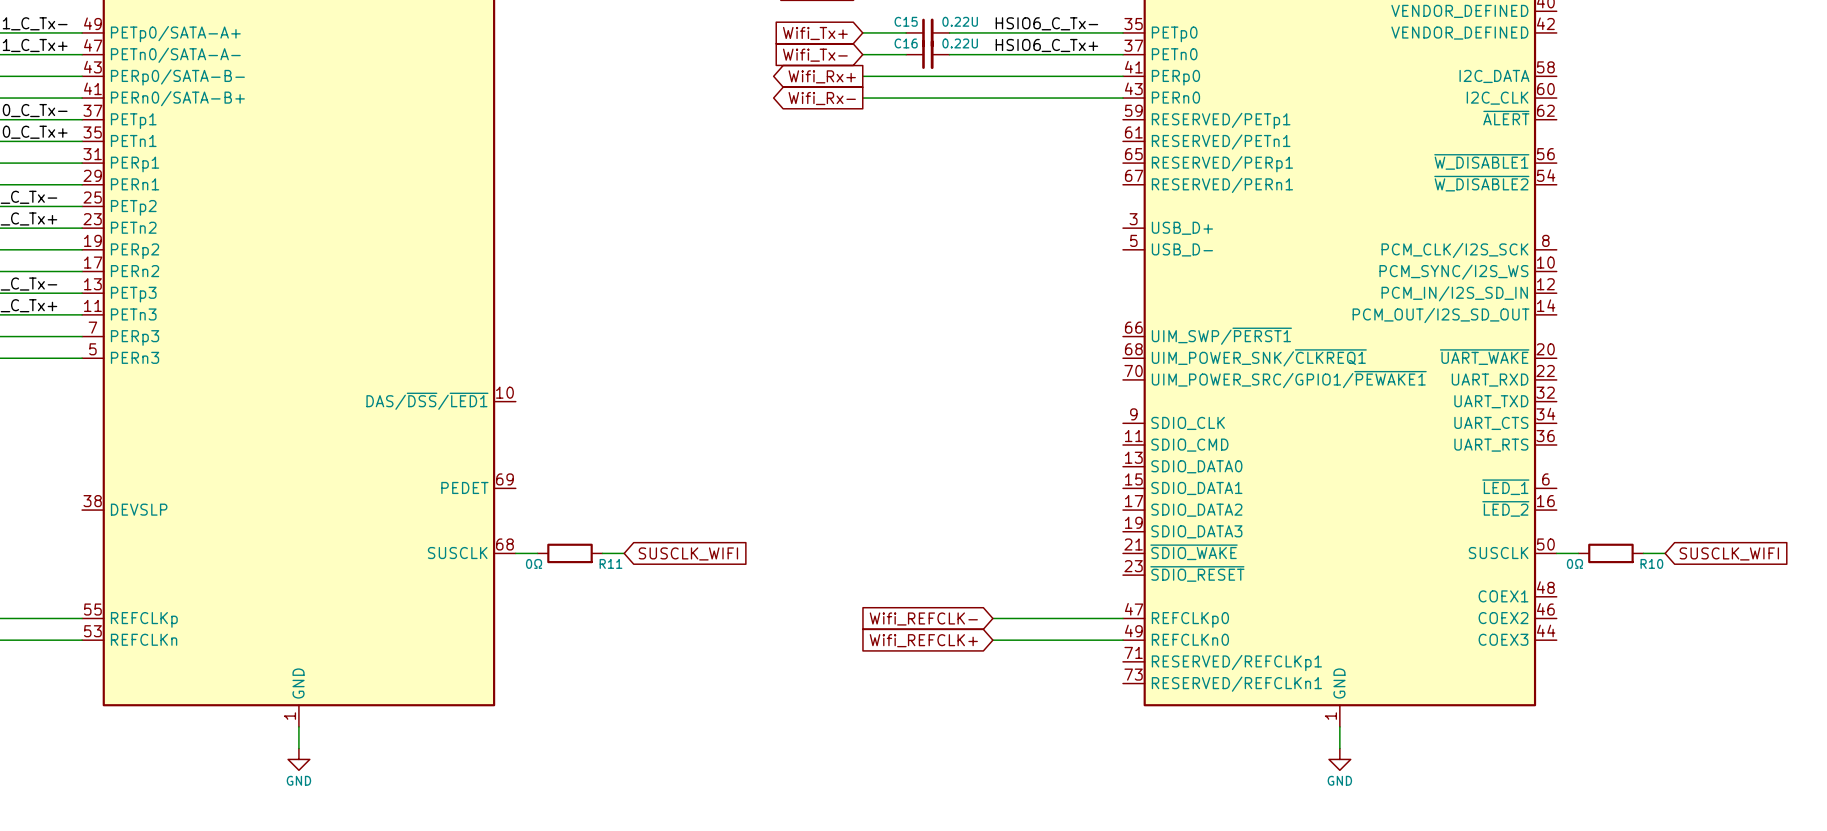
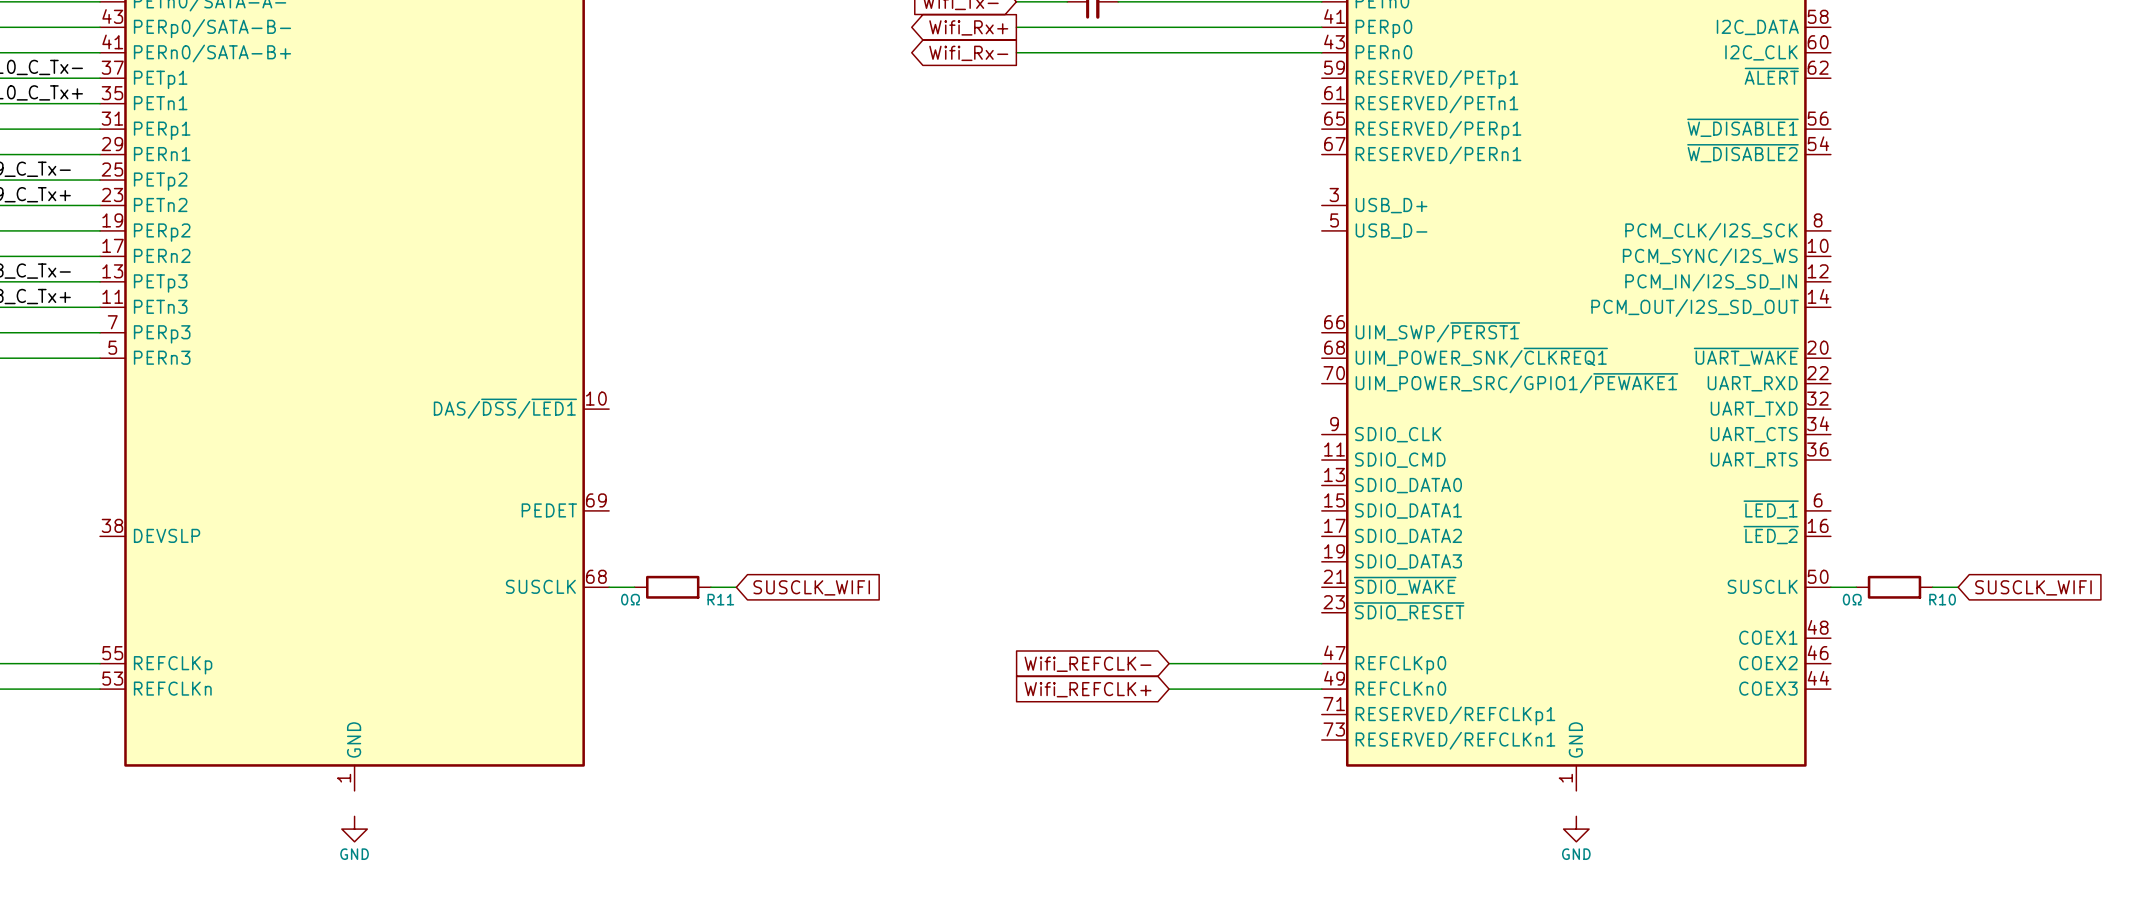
wire: (298, 726) (298, 748) -> none
wire: (1339, 726) (1339, 748) -> none

